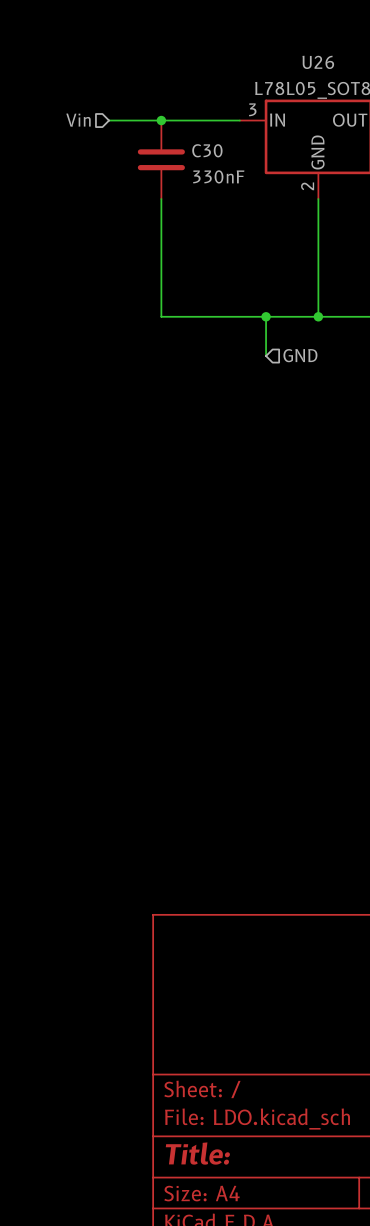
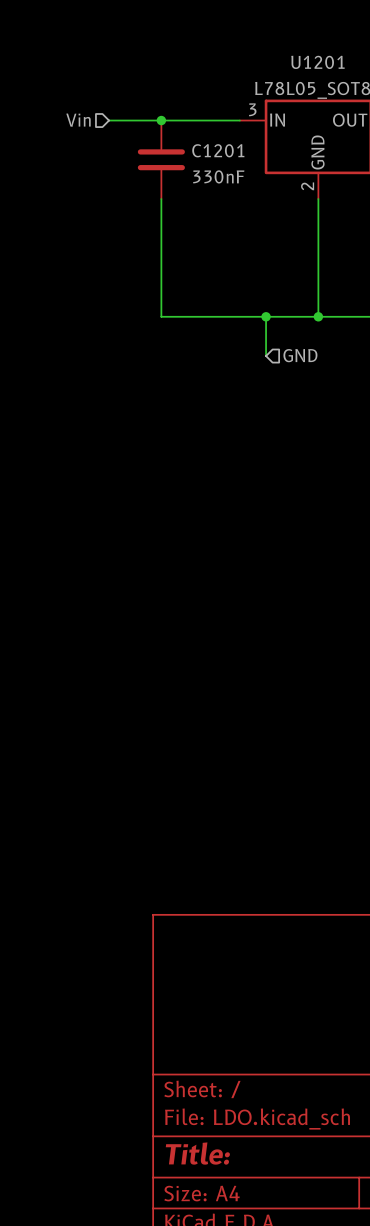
U26 name: U26 (318, 62) -> U1201 (317, 62)
C30 name: C30 (207, 150) -> C1201 (218, 150)

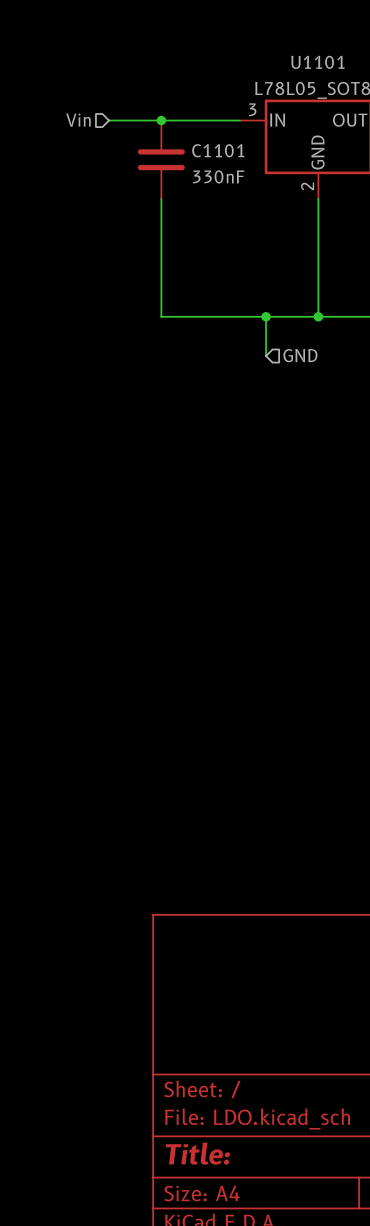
U1201 name: U1201 (317, 62) -> U1101 (317, 62)
C1201 name: C1201 (218, 150) -> C1101 (218, 150)

